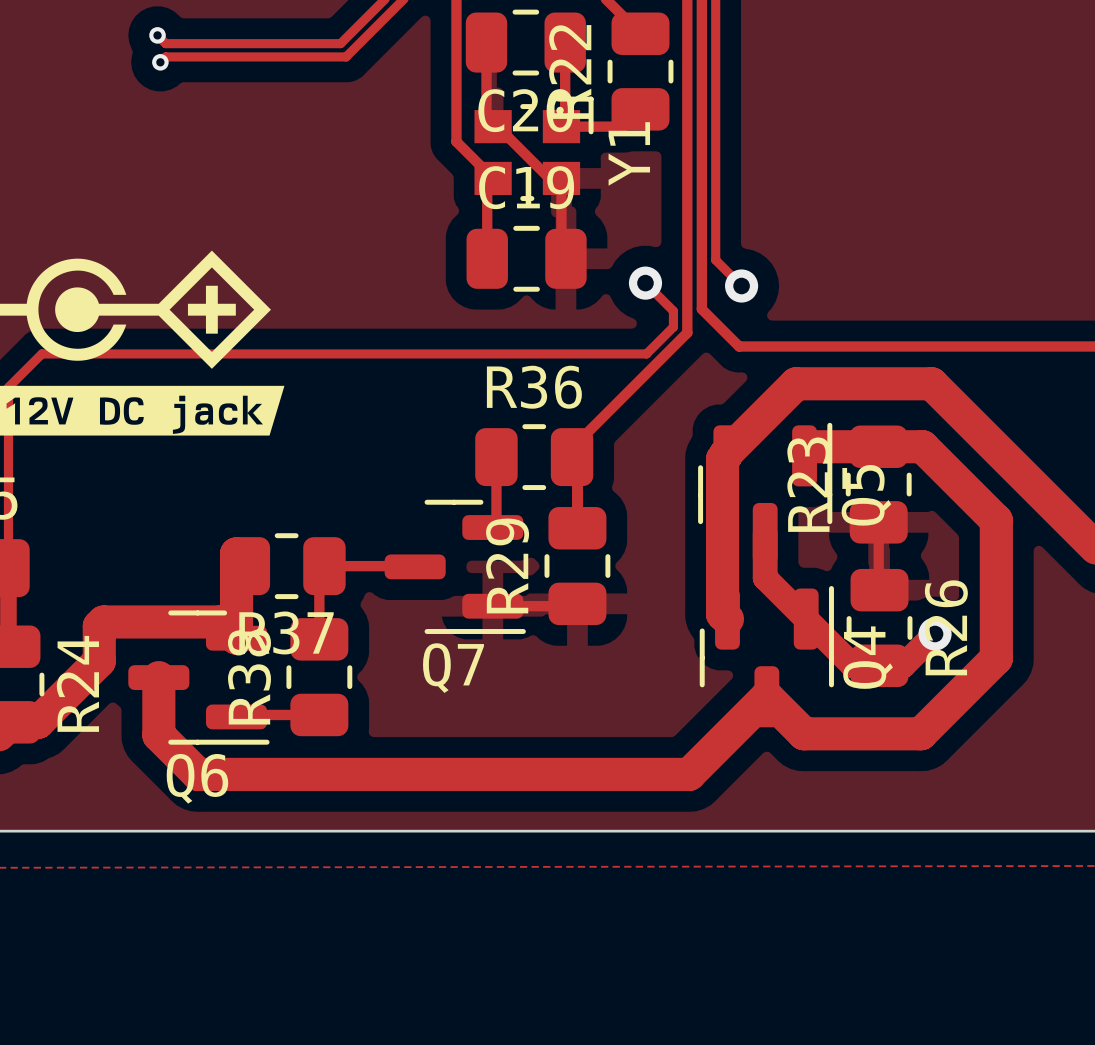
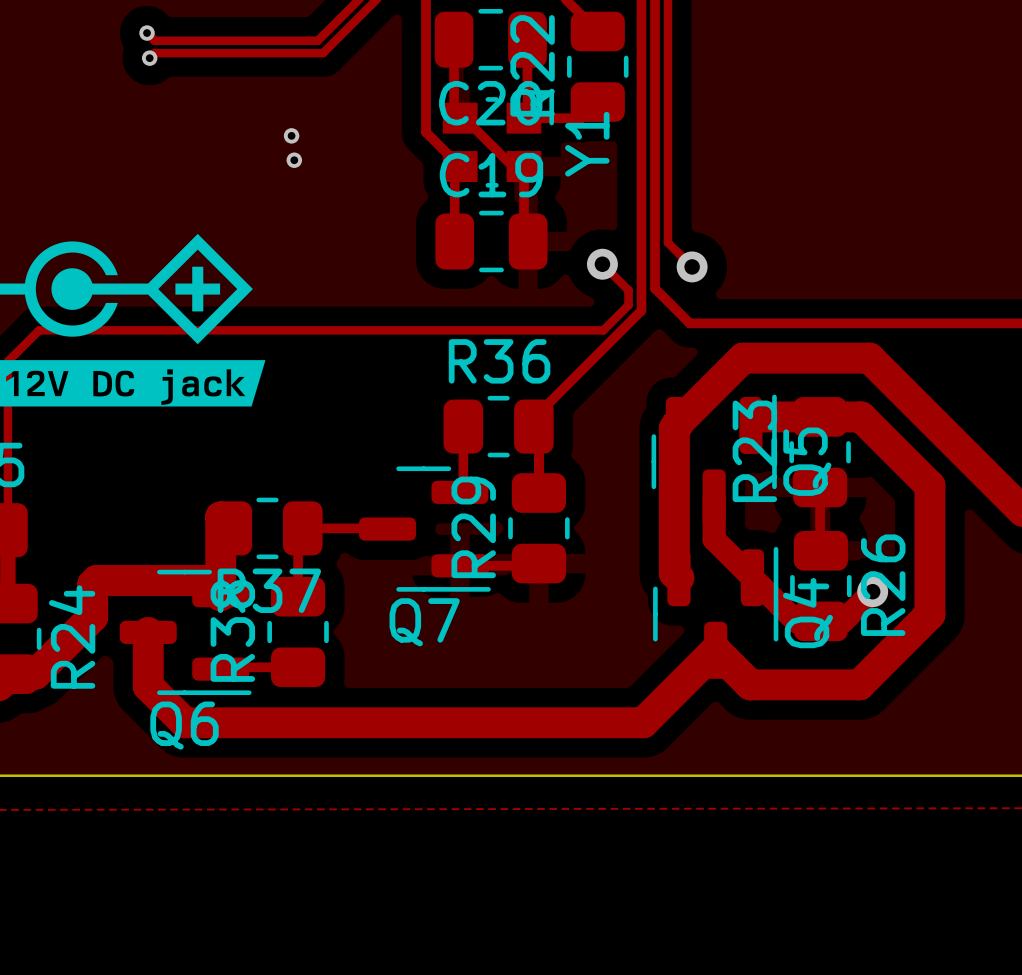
via: none -> (291, 135)
via: none -> (294, 160)

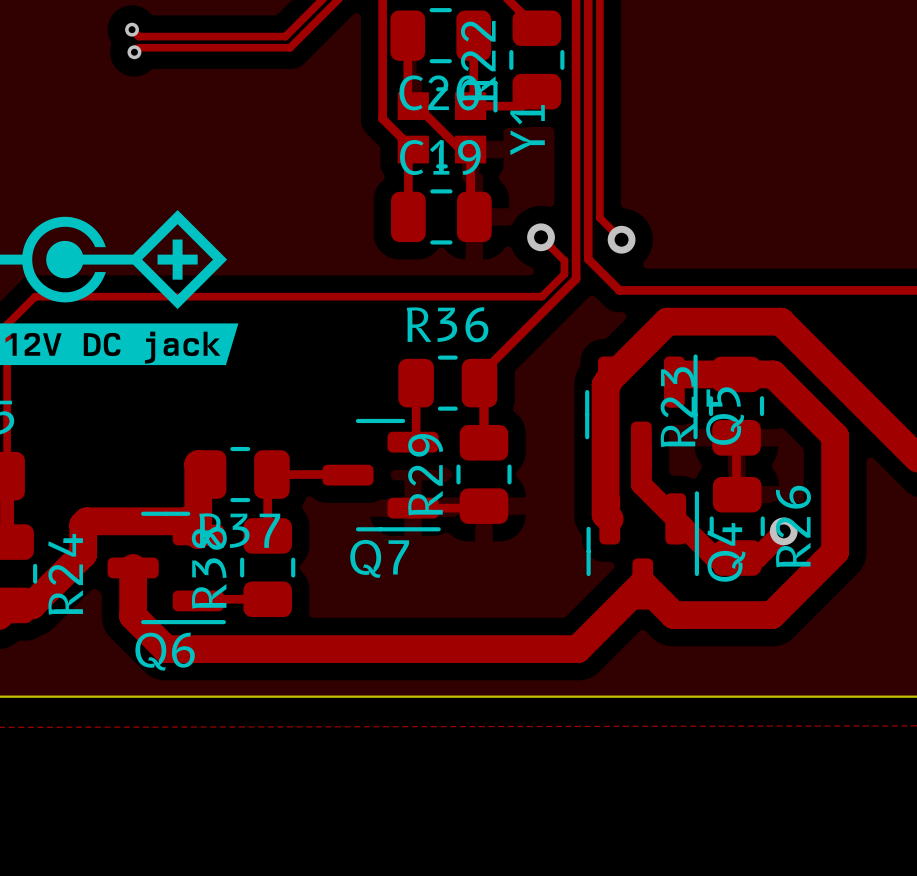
via: (291, 135) -> none
via: (294, 160) -> none

